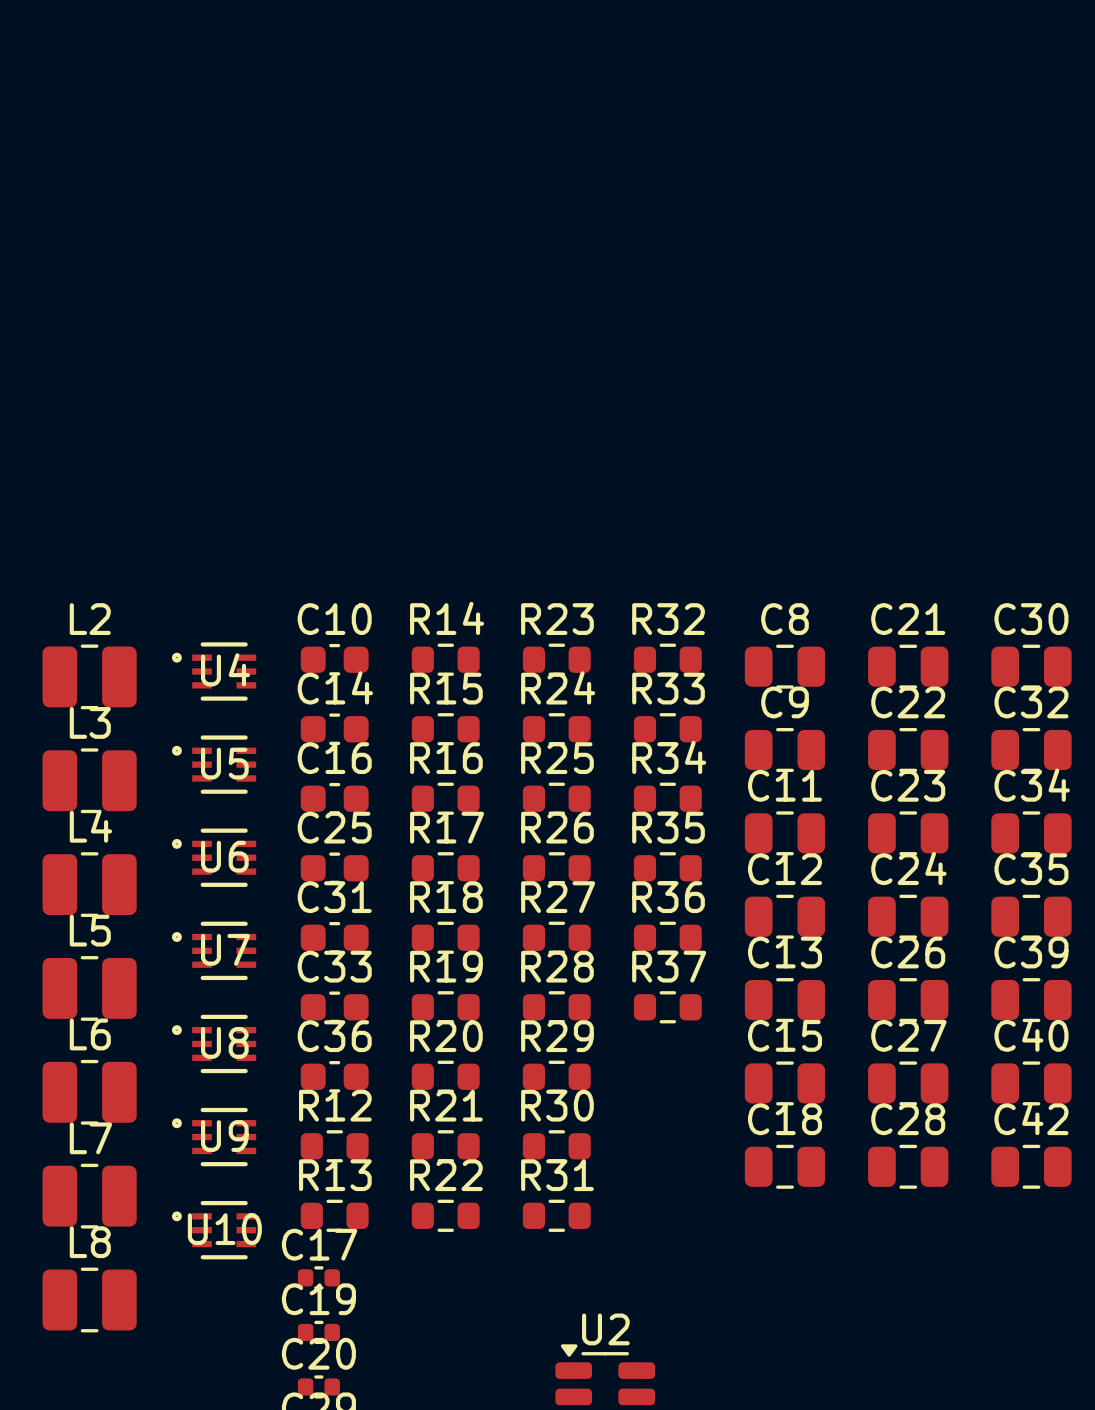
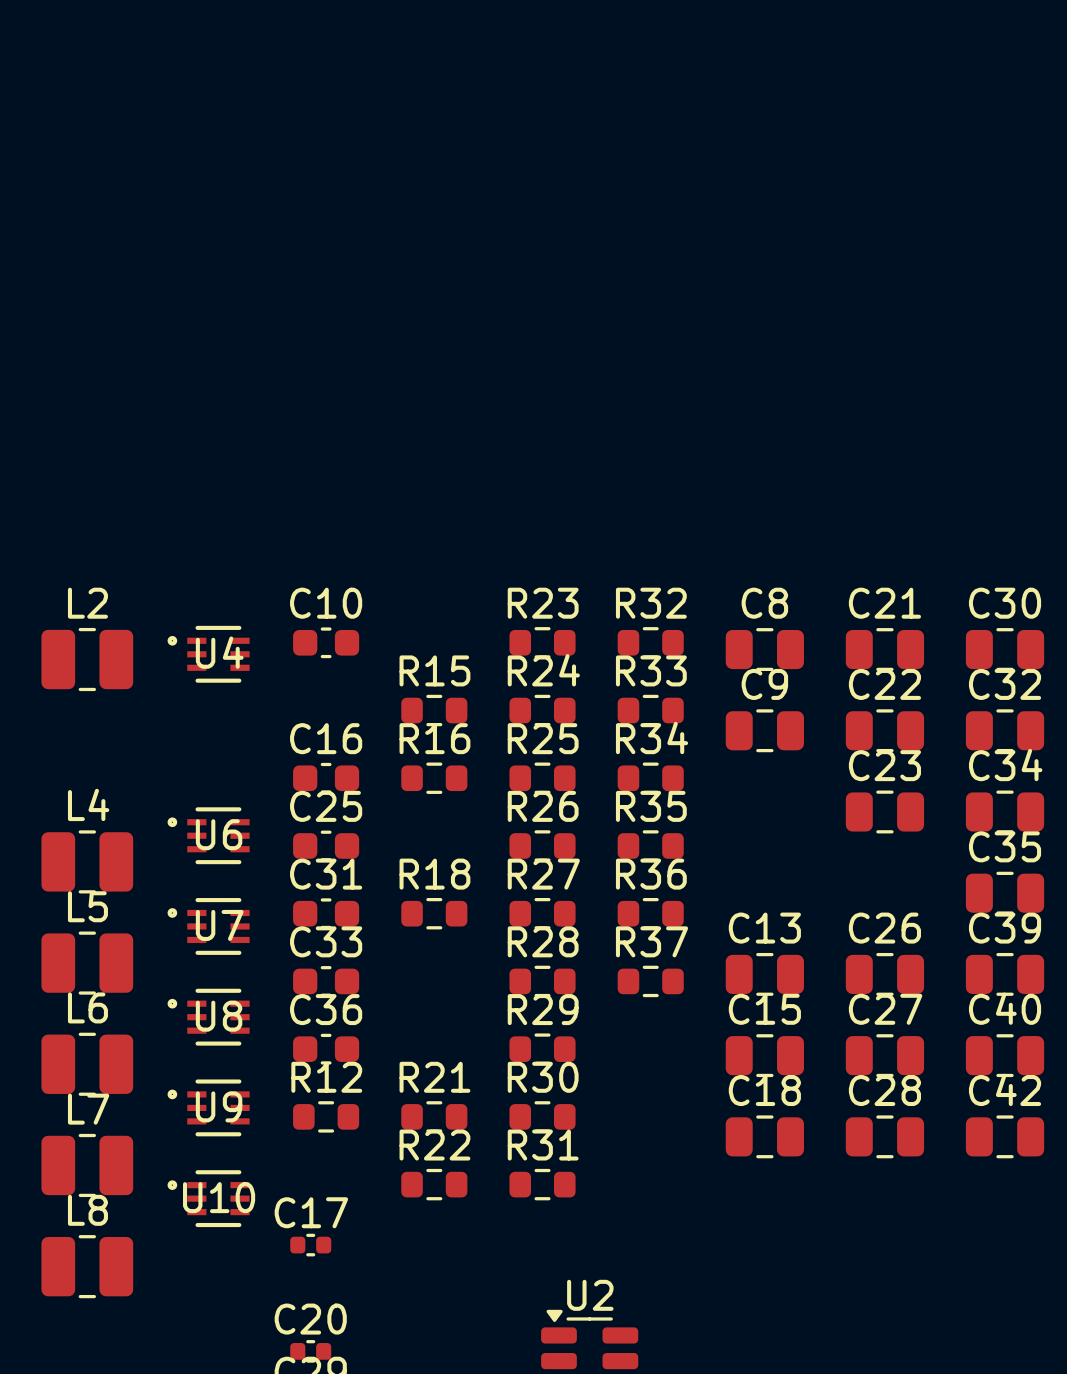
R14: (445, 659) -> none
C14: (334, 729) -> none
U5: (214, 764) -> none
L3: (89, 780) -> none
C11: (785, 833) -> none
R17: (445, 868) -> none
C12: (785, 916) -> none
C24: (908, 916) -> none
R19: (445, 1007) -> none
R20: (445, 1076) -> none
R13: (334, 1215) -> none
C19: (318, 1332) -> none

